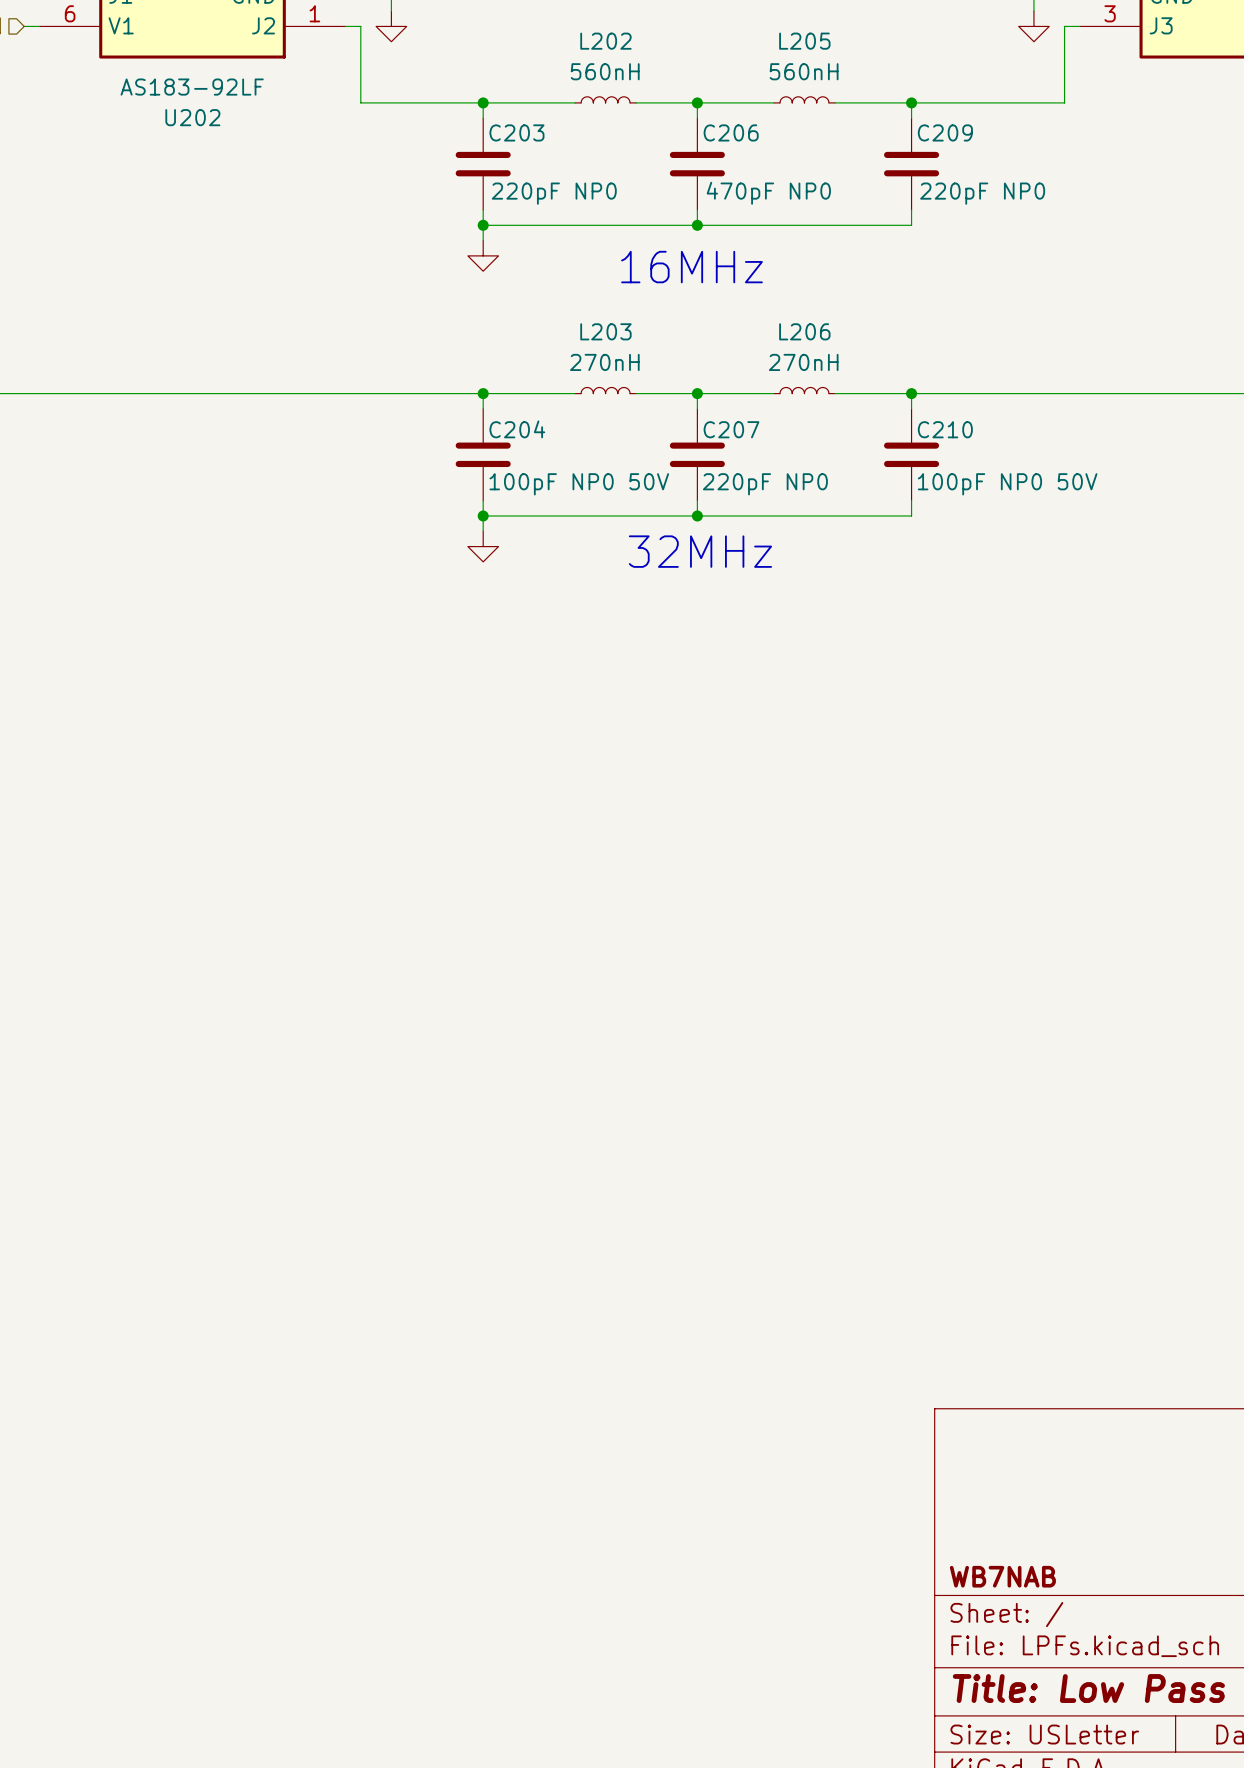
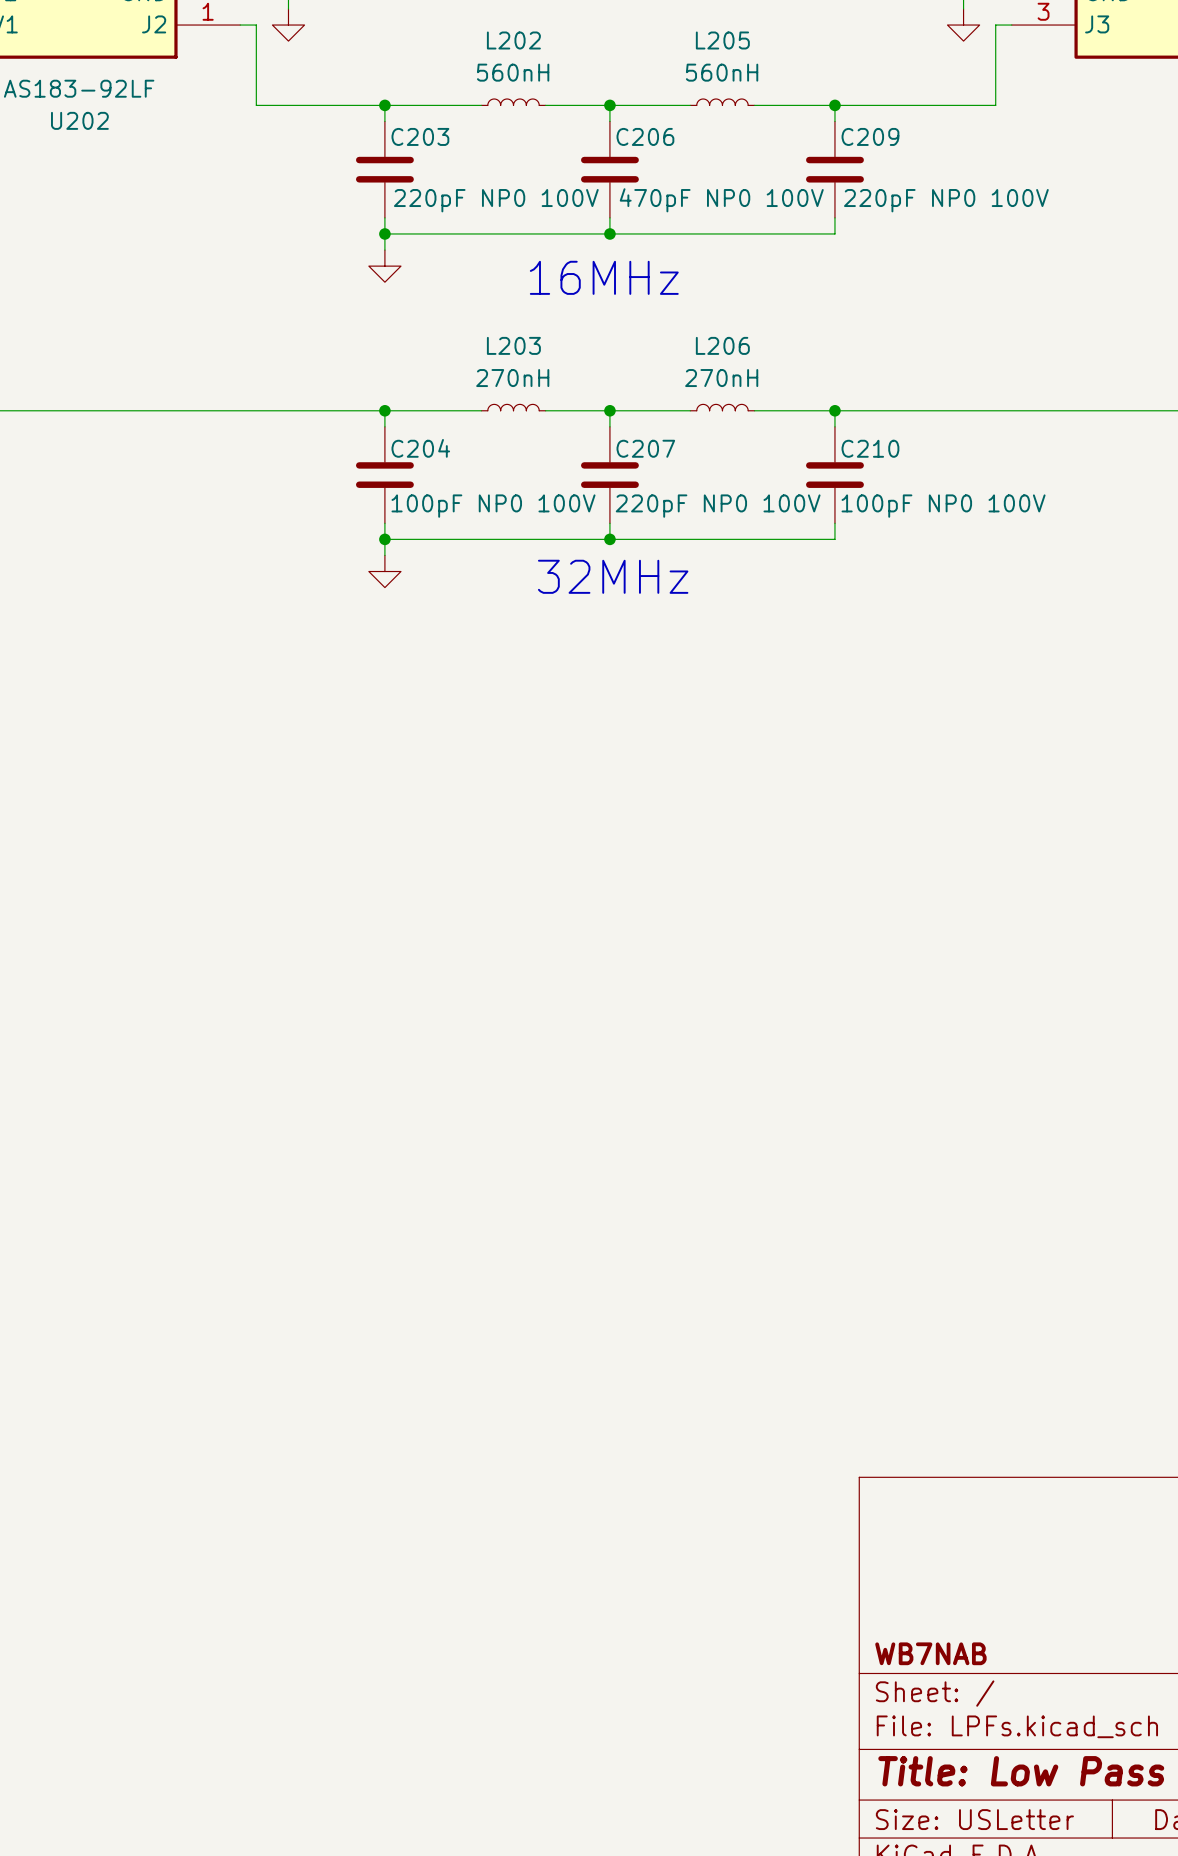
C203 value: 220pF NP0 (554, 193) -> 220pF NP0 100V (496, 200)
C206 value: 470pF NP0 (768, 193) -> 470pF NP0 100V (721, 200)
C209 value: 220pF NP0 (982, 193) -> 220pF NP0 100V (946, 200)
C204 value: 100pF NP0 50V (579, 484) -> 100pF NP0 100V (493, 506)
C207 value: 220pF NP0 (765, 484) -> 220pF NP0 100V (718, 506)
C210 value: 100pF NP0 50V (1007, 484) -> 100pF NP0 100V (943, 506)

